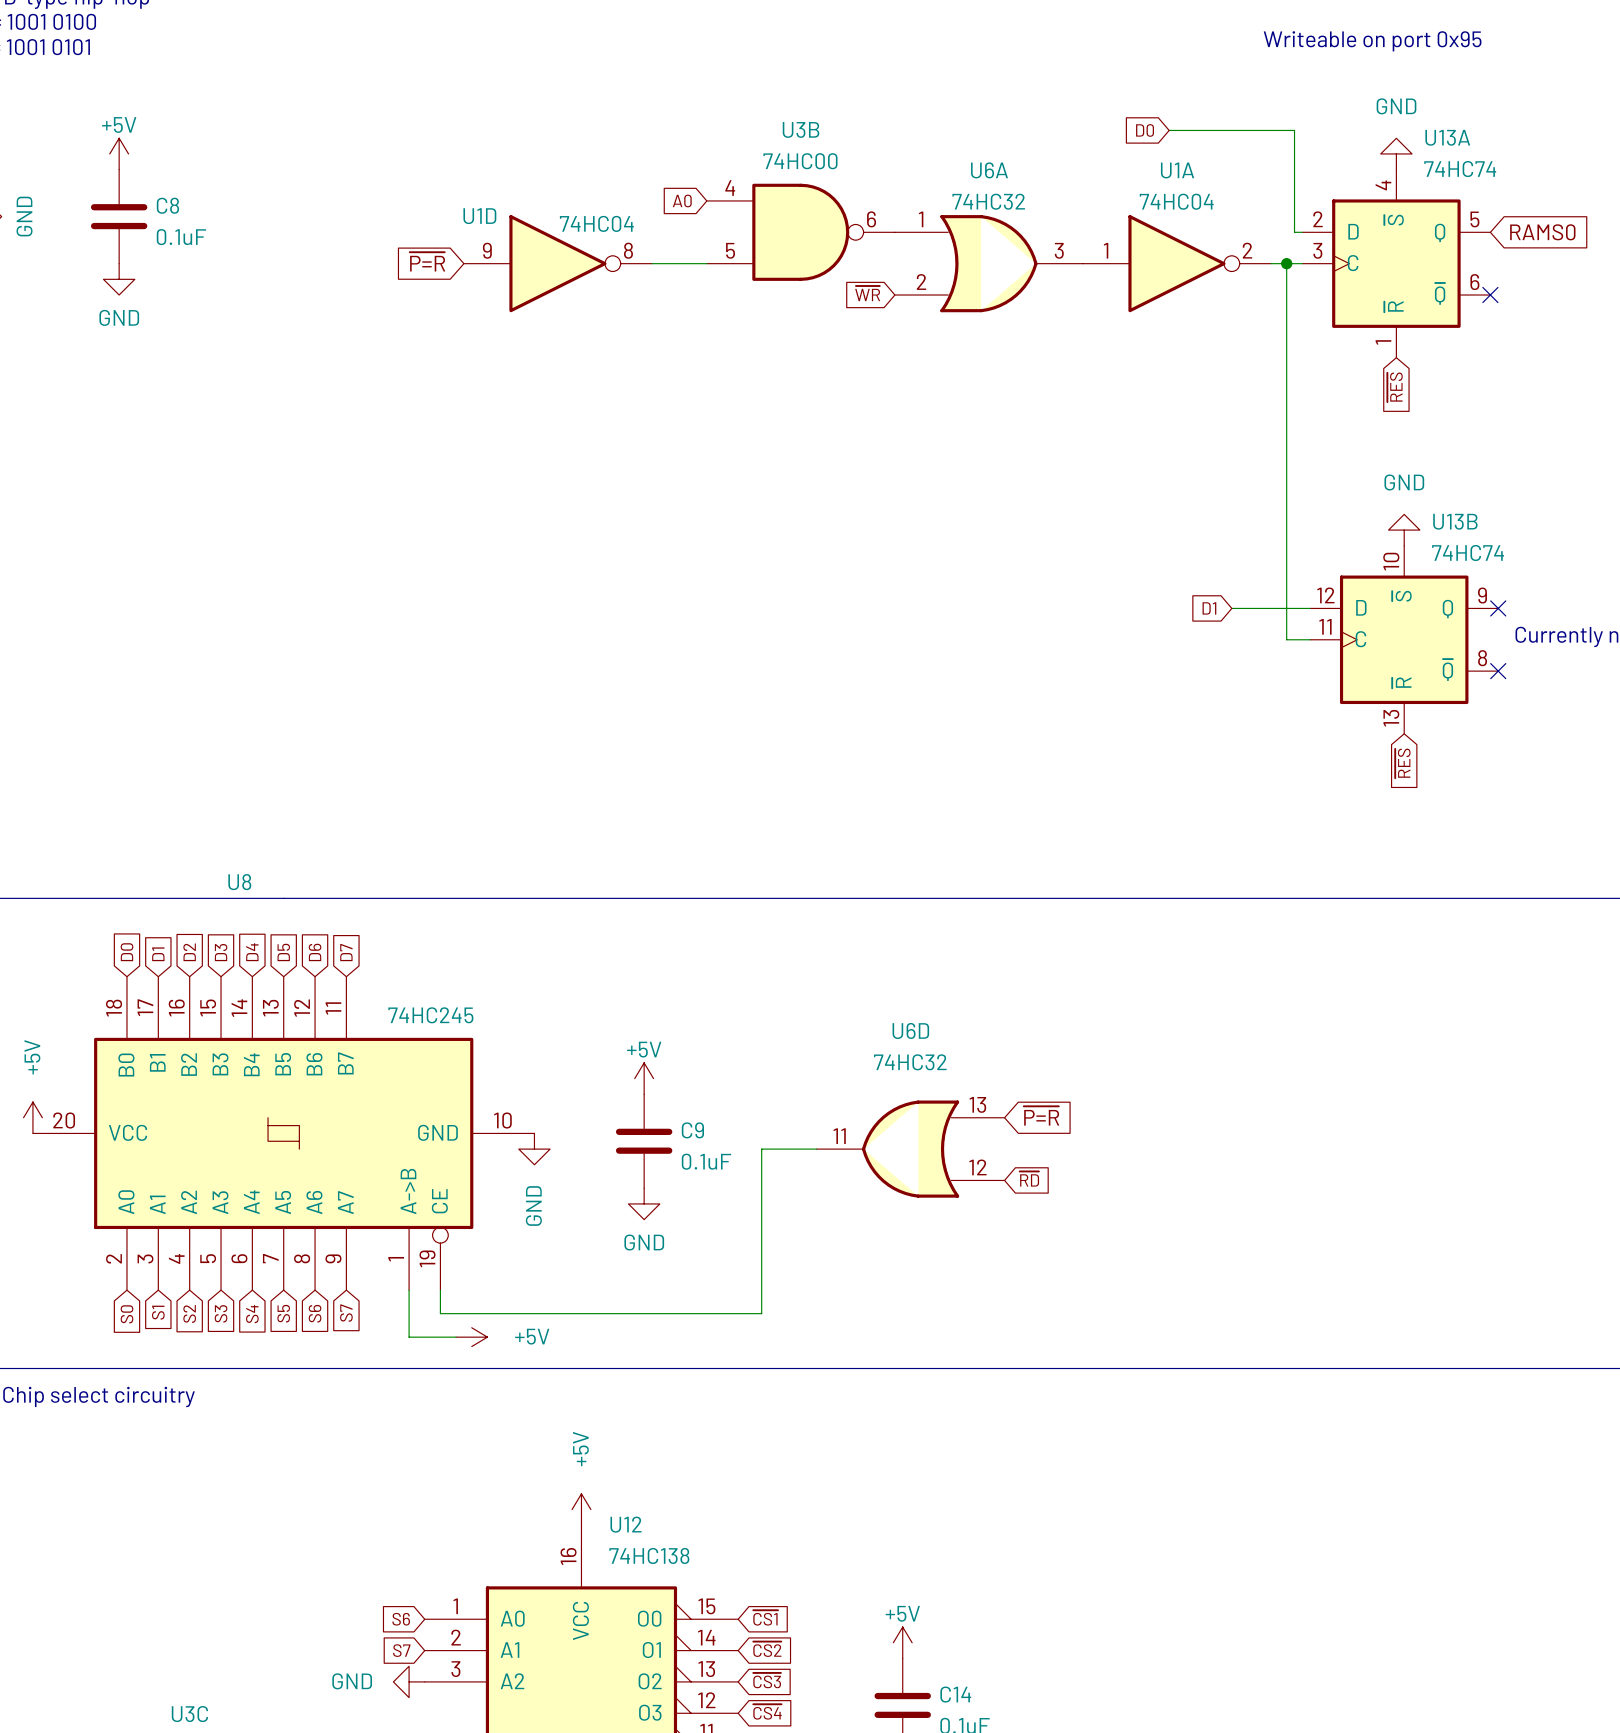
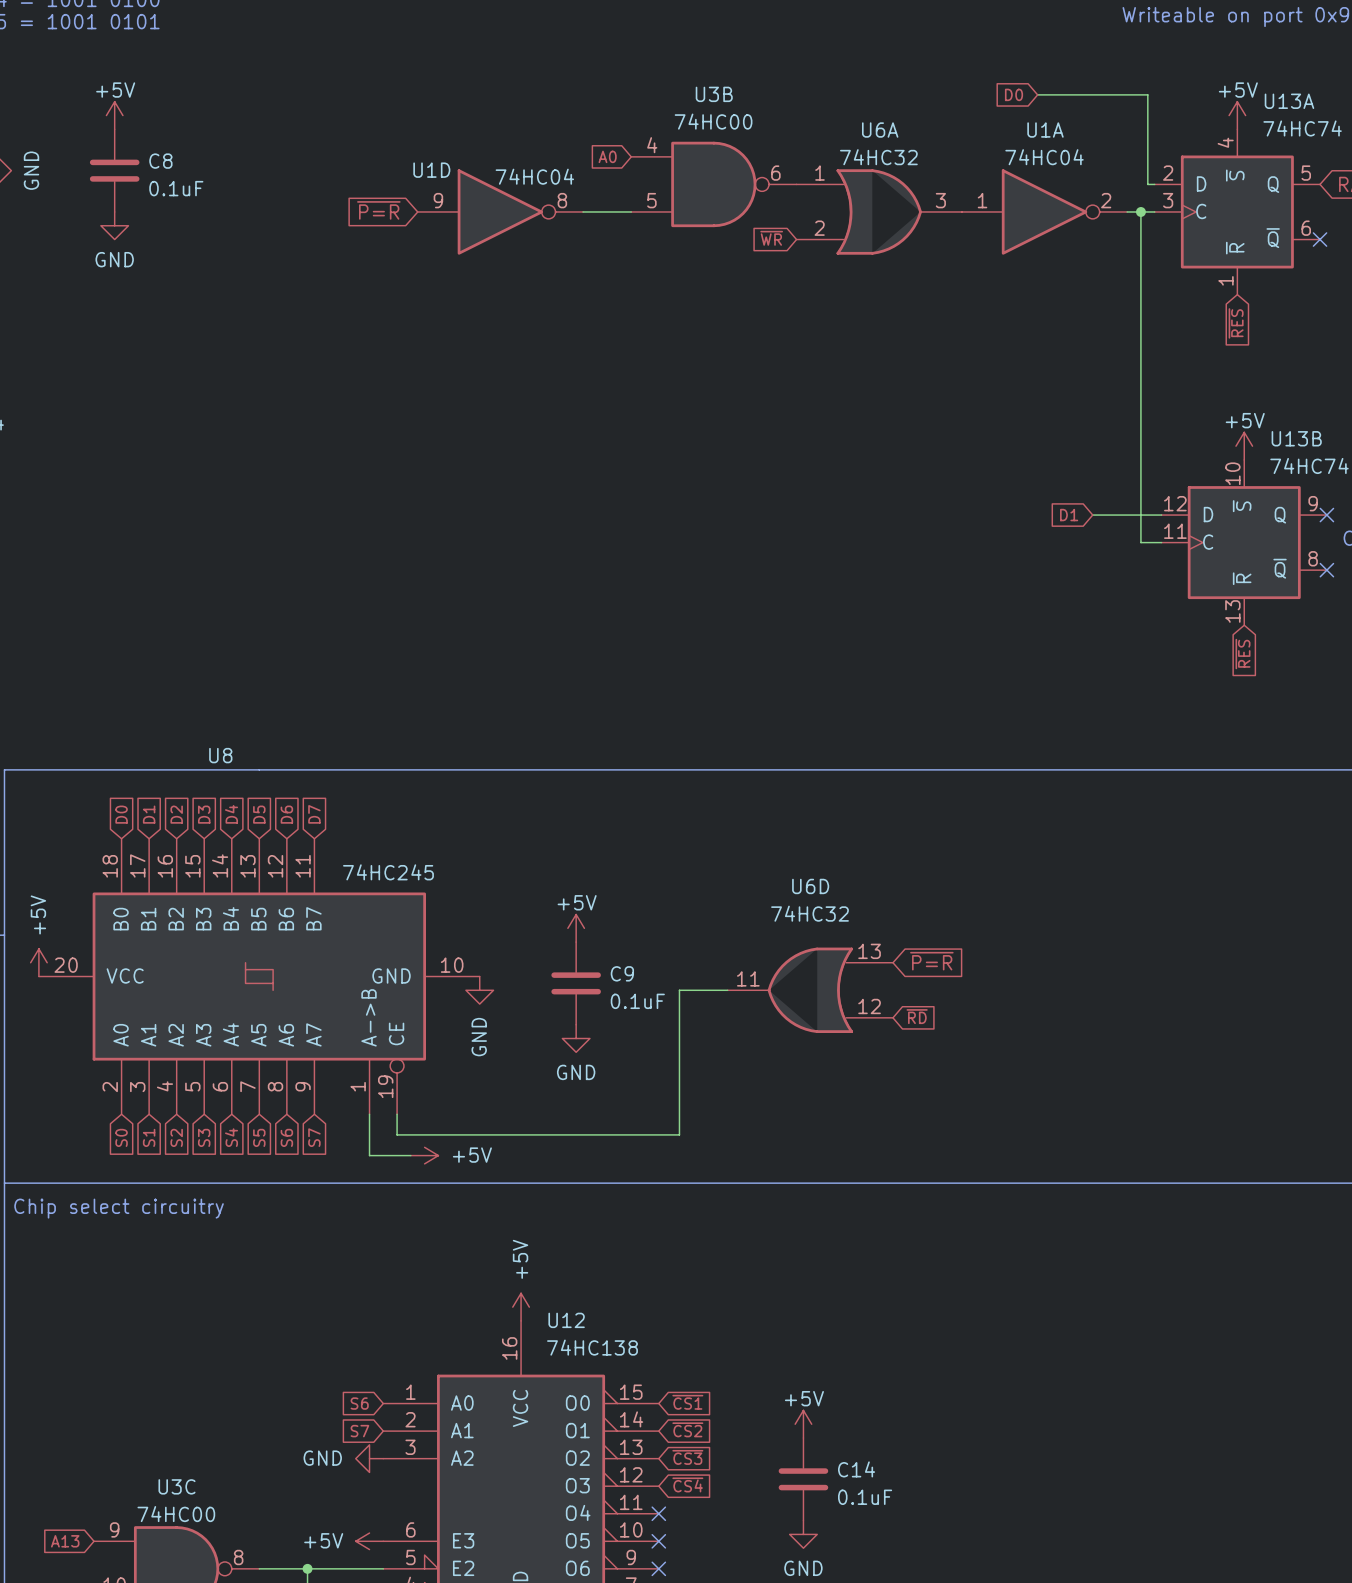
power symbol: GND (1396, 153) -> +5V (1237, 115)
power symbol: GND (1404, 530) -> +5V (1244, 446)

